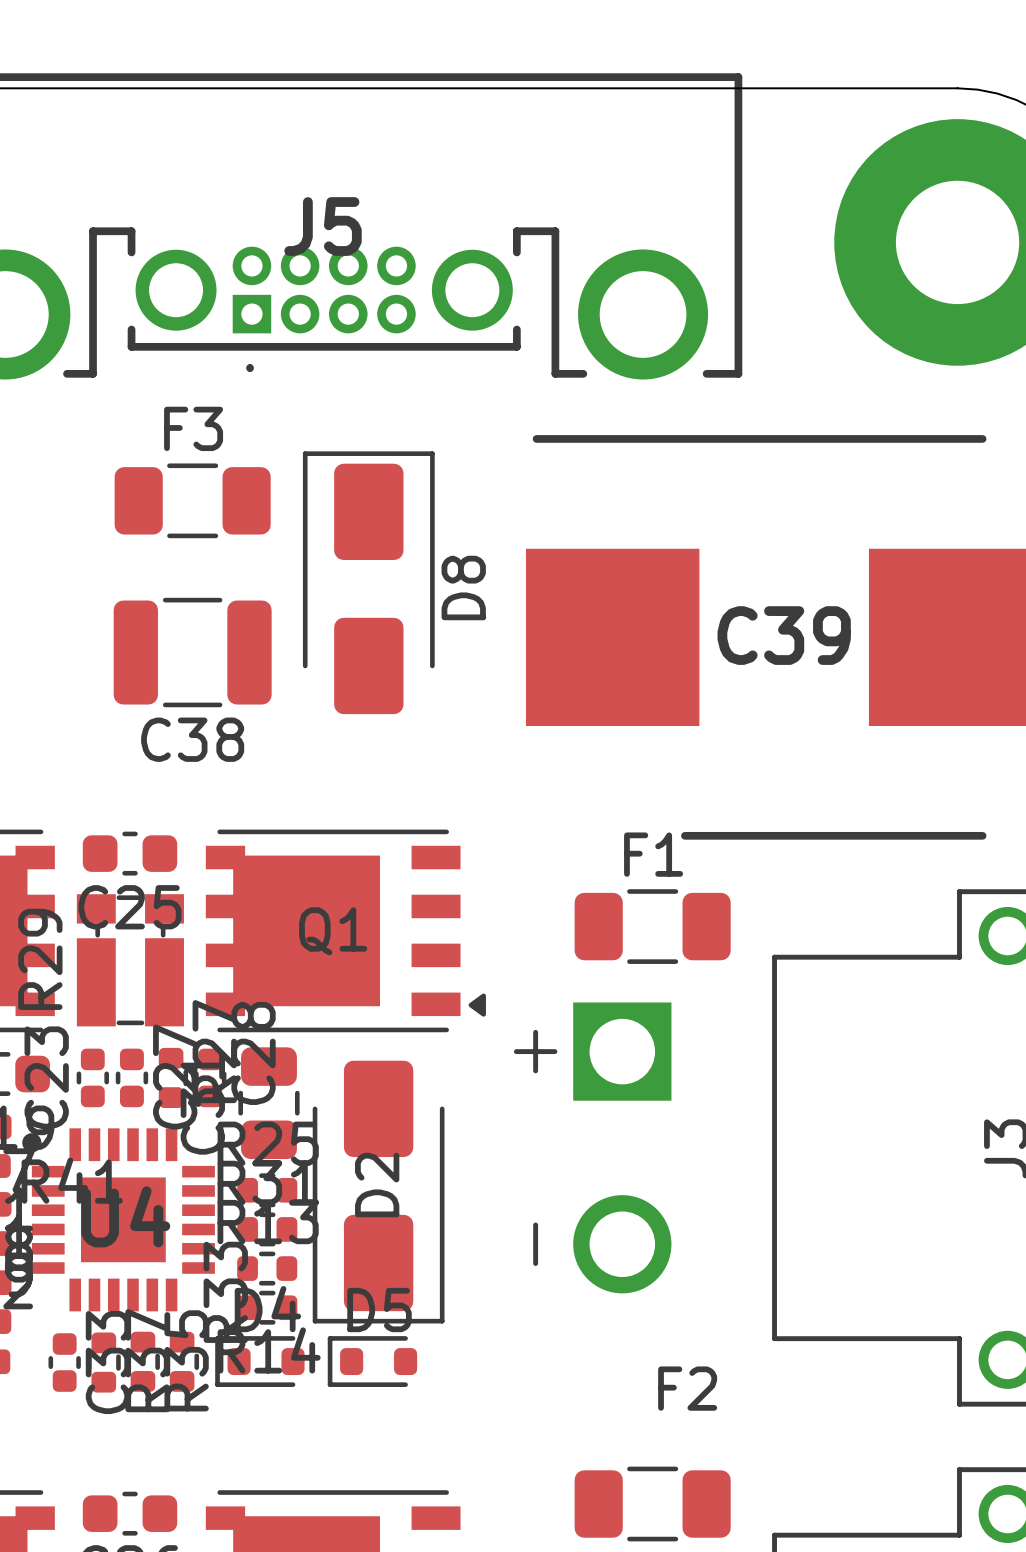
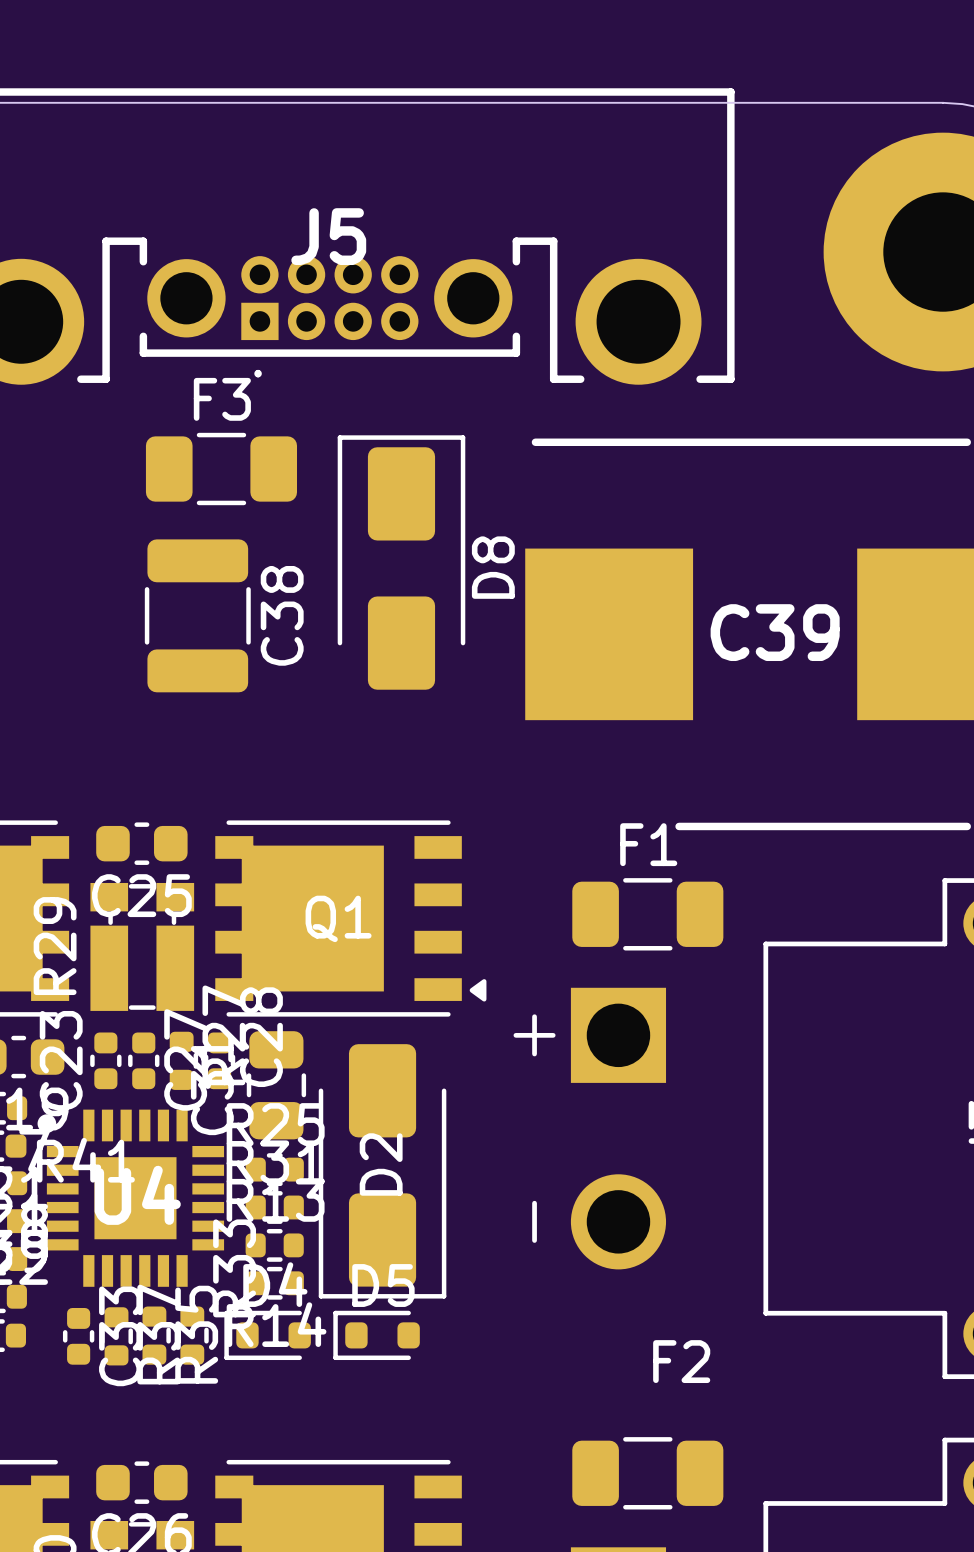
F3 position: (192, 500) -> (221, 469)
D8 position: (368, 582) -> (401, 562)
C38 rotation: 0° (192, 652) -> 90° clockwise (197, 615)
C38 name position: C38 (192, 739) -> C38 (282, 615)

